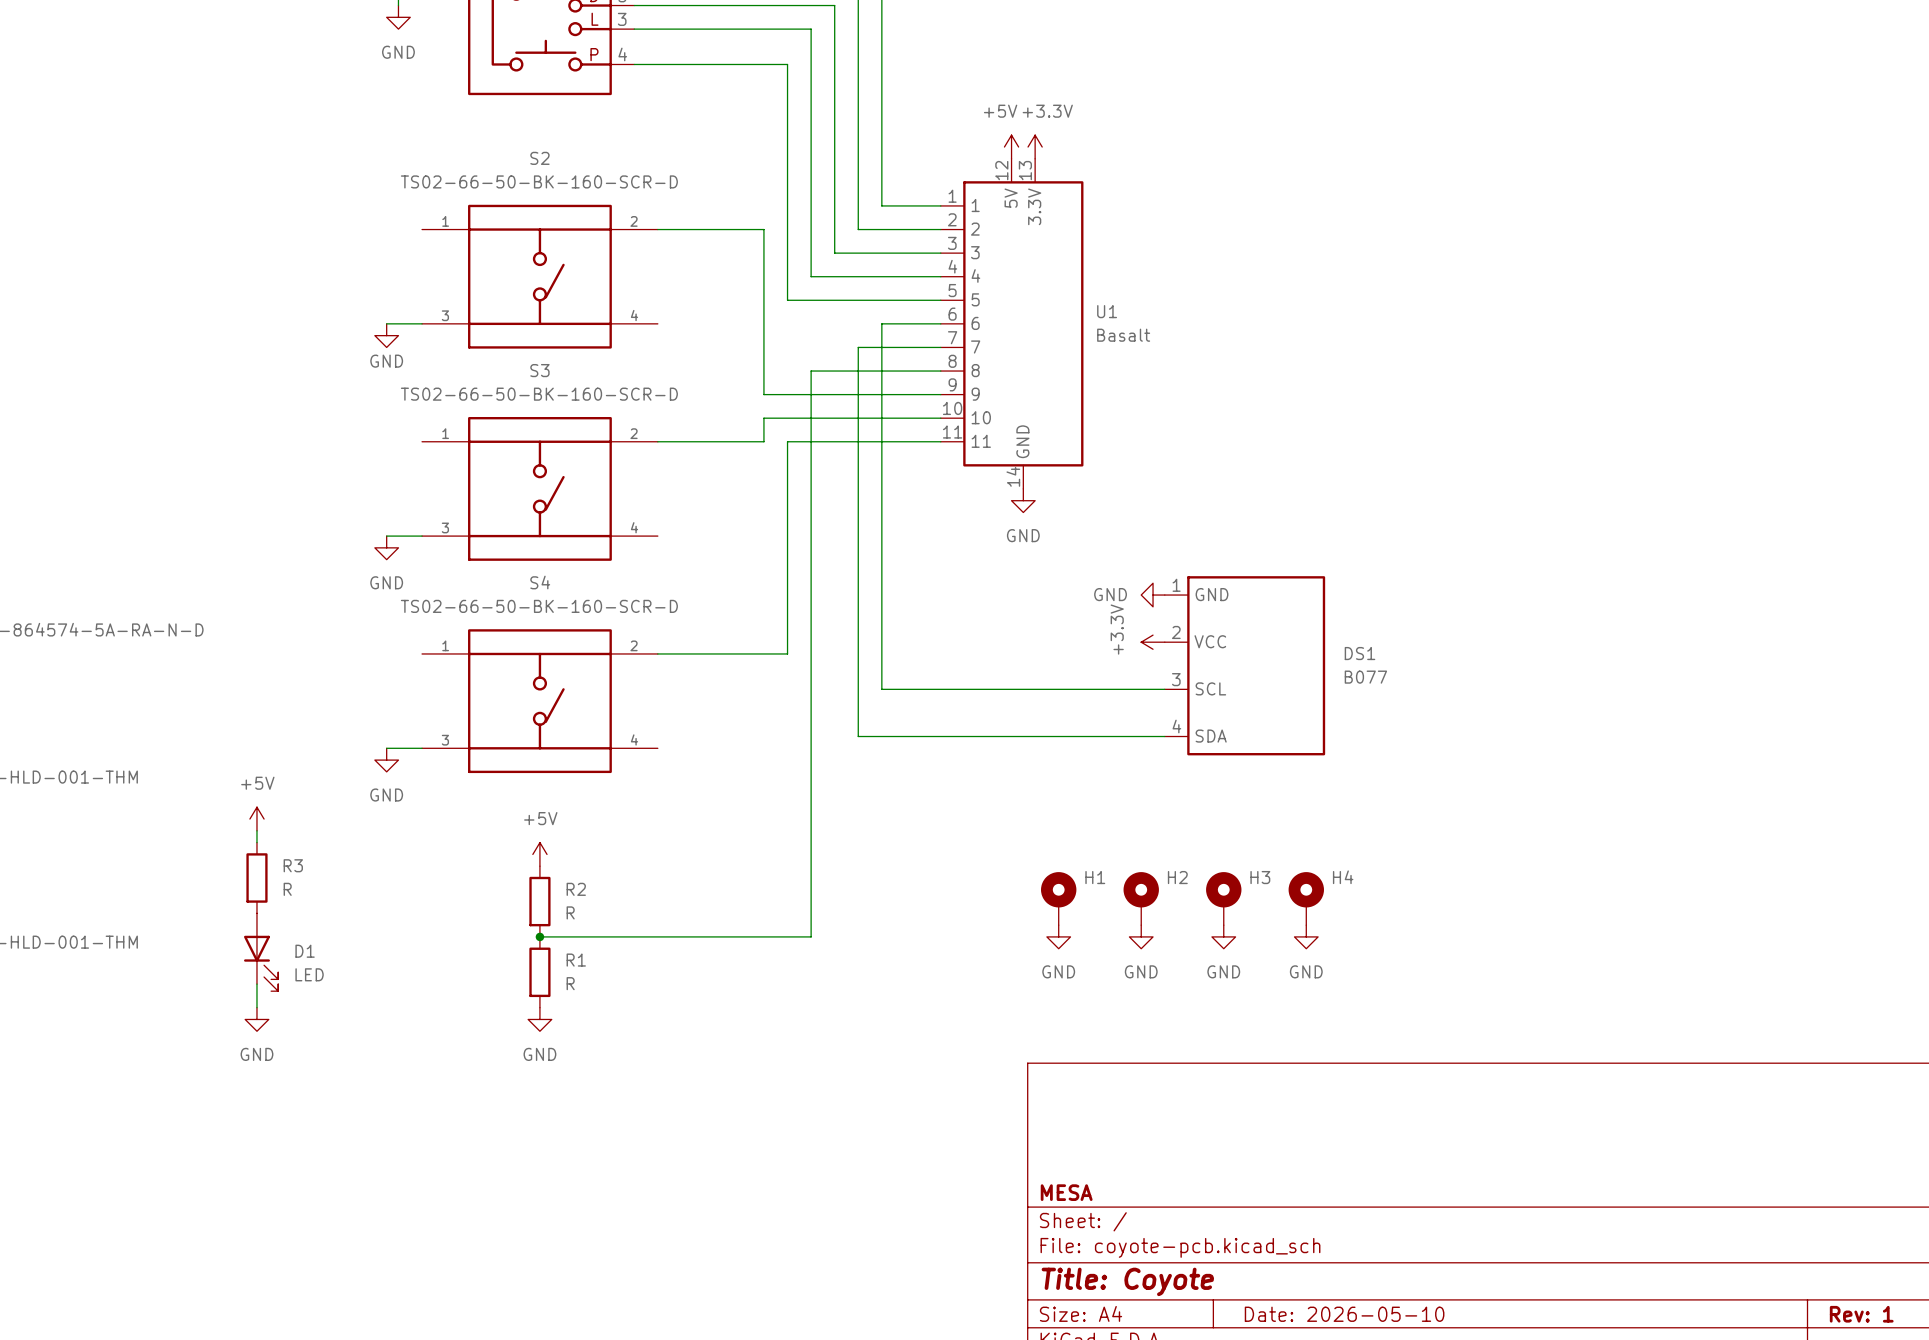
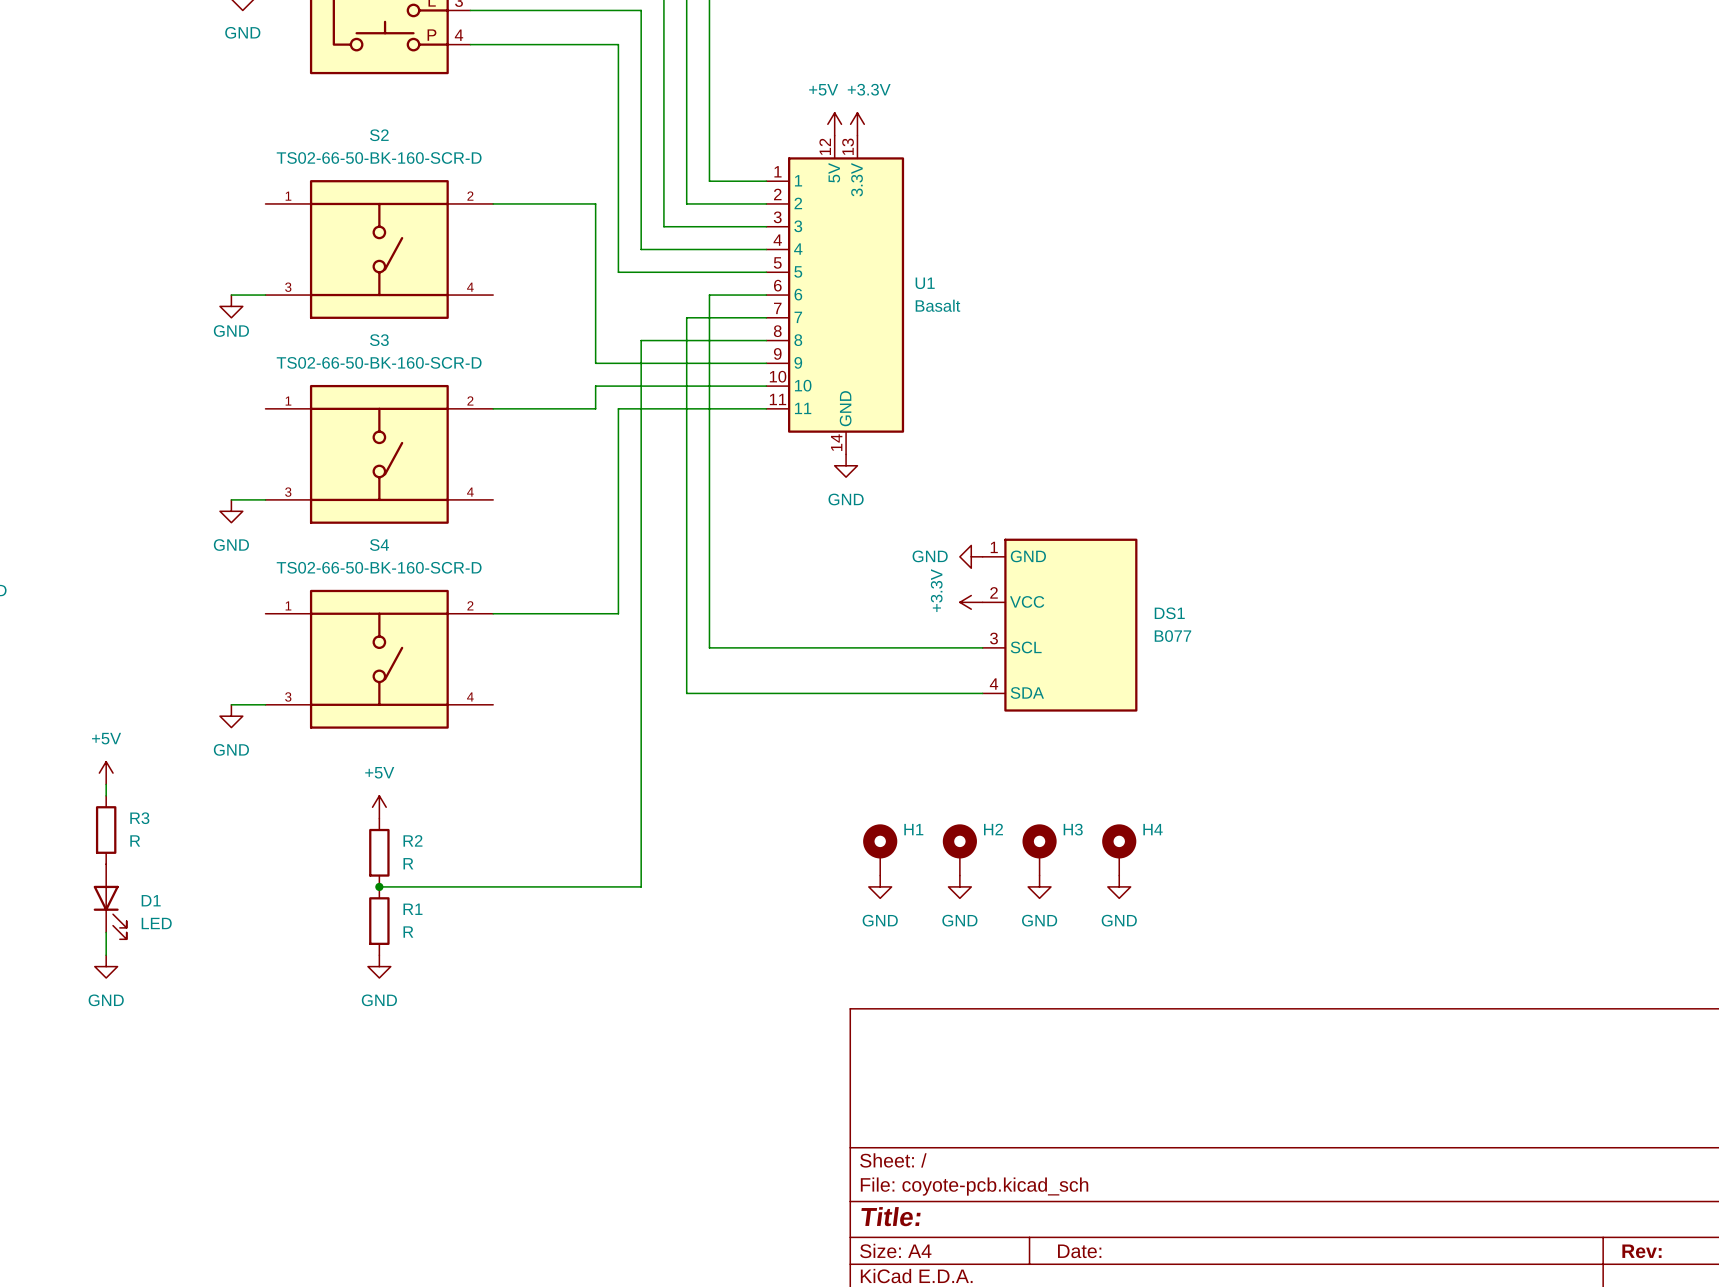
title block: MESA (1066, 1192) -> none
title block: Title: Coyote (1127, 1281) -> Title: (891, 1216)
title block: Date: 2026-05-10 (1344, 1314) -> Date: (1079, 1251)
title block: Rev: 1 (1861, 1314) -> Rev: (1641, 1251)

